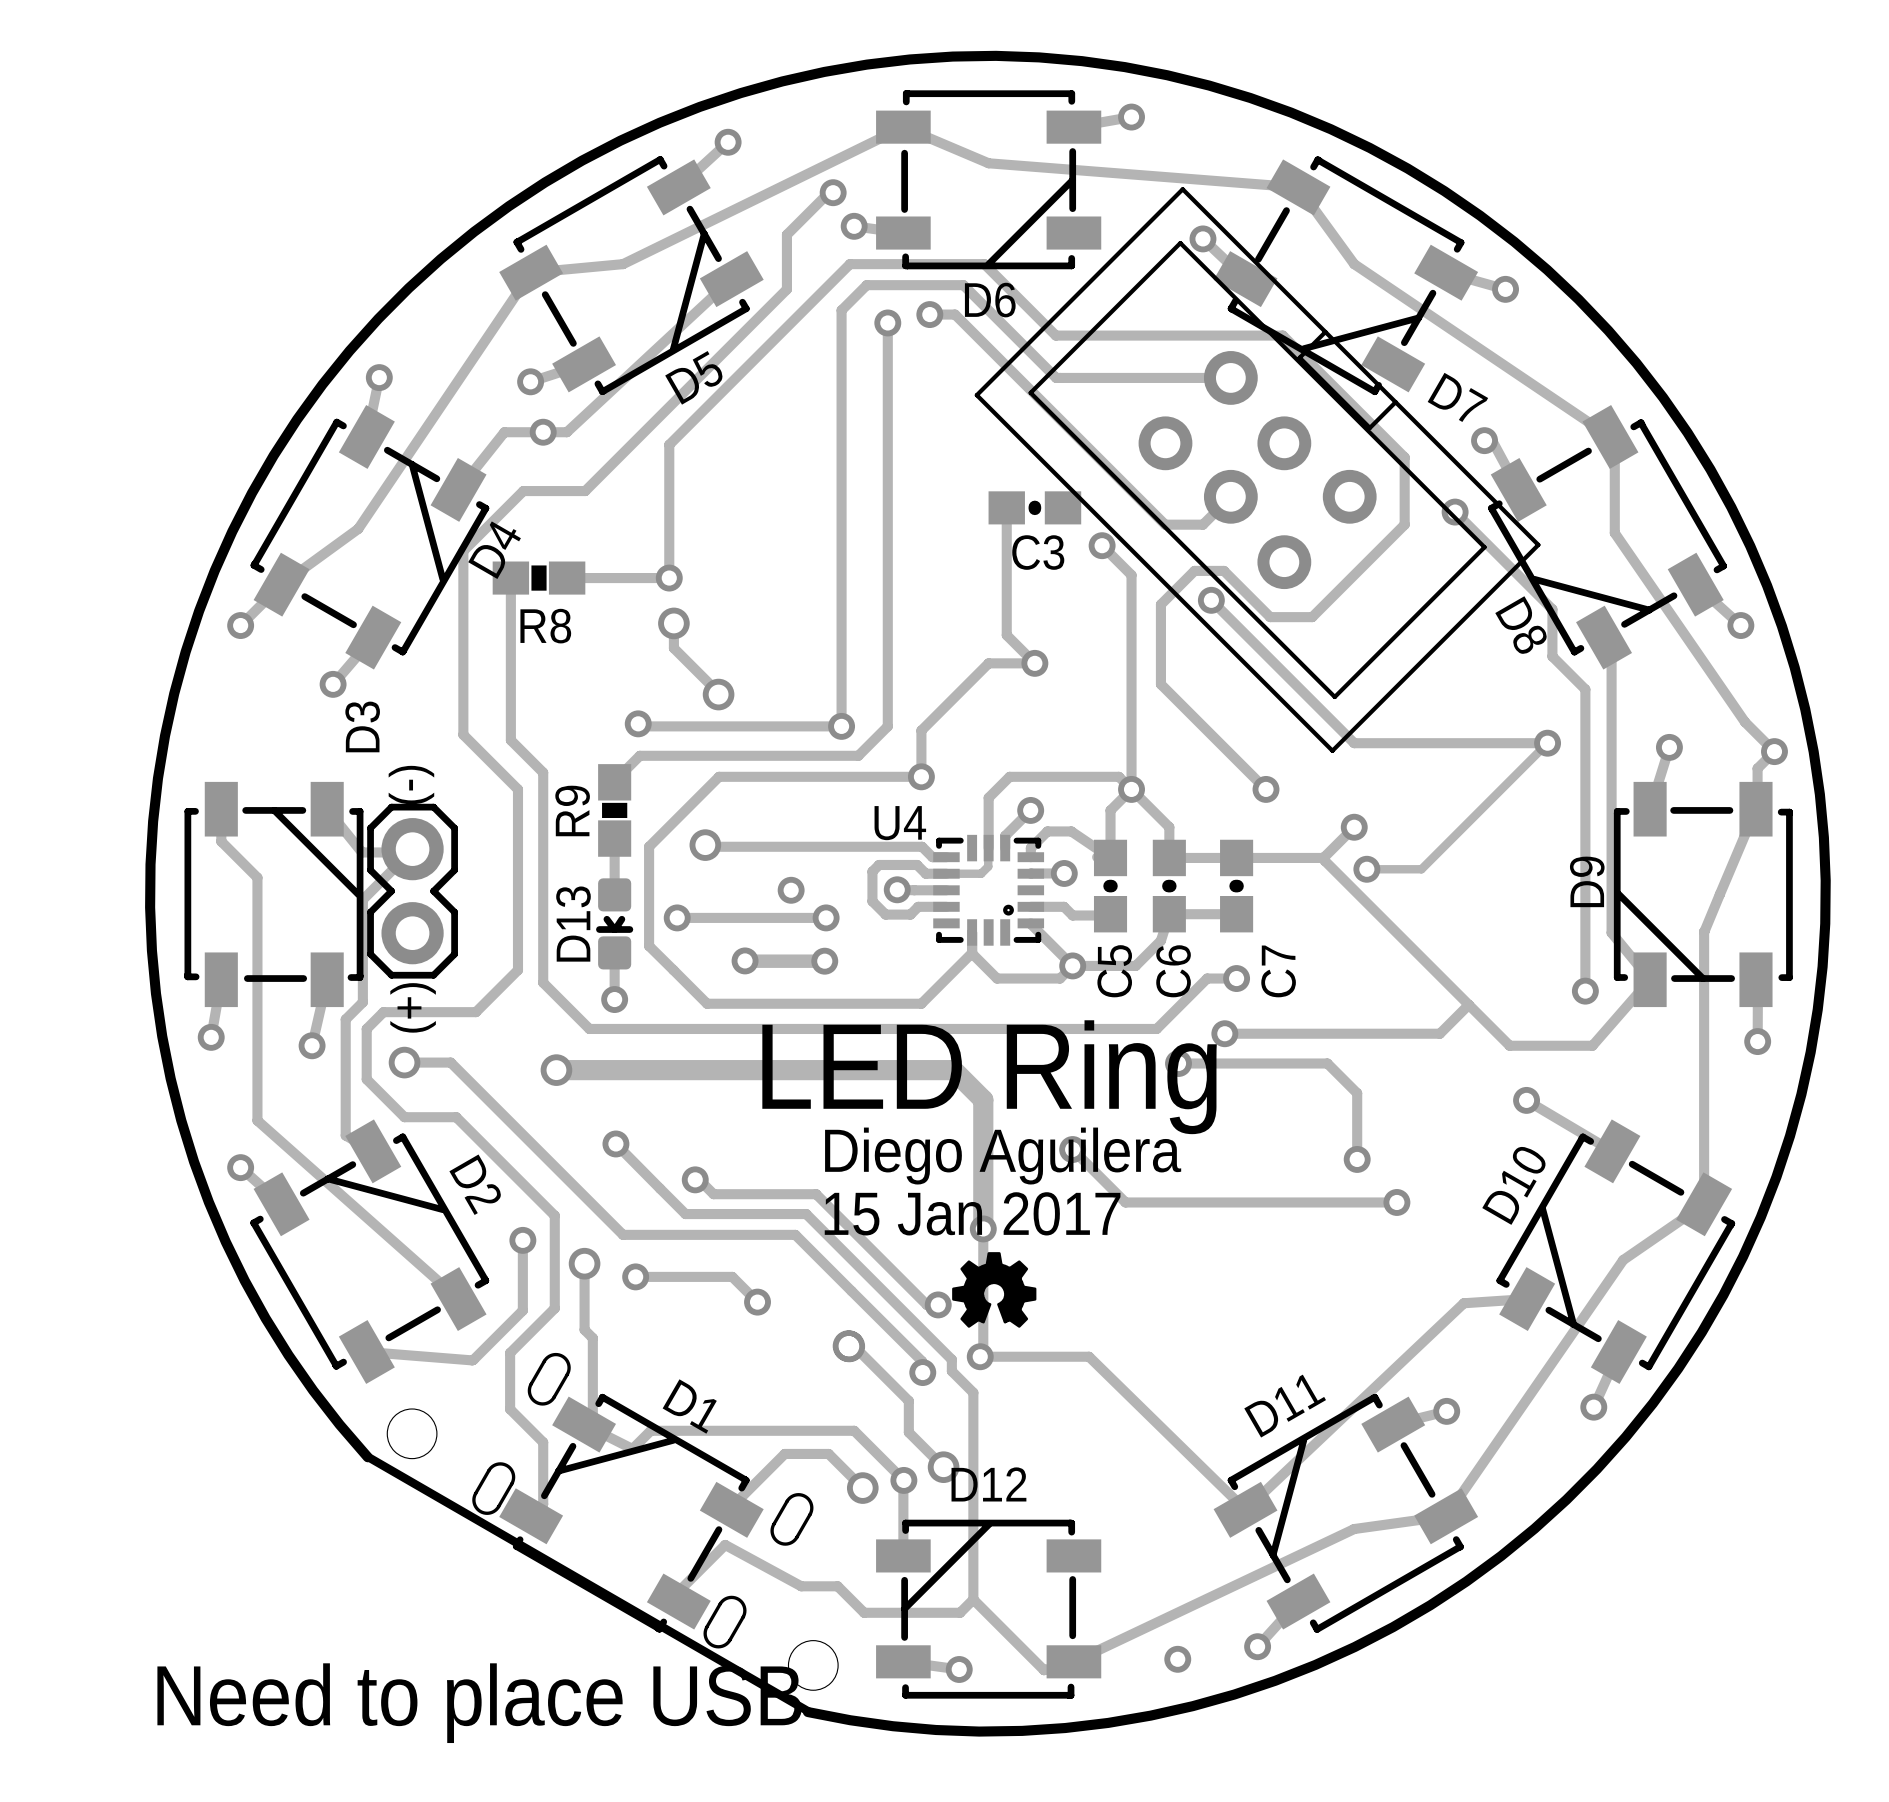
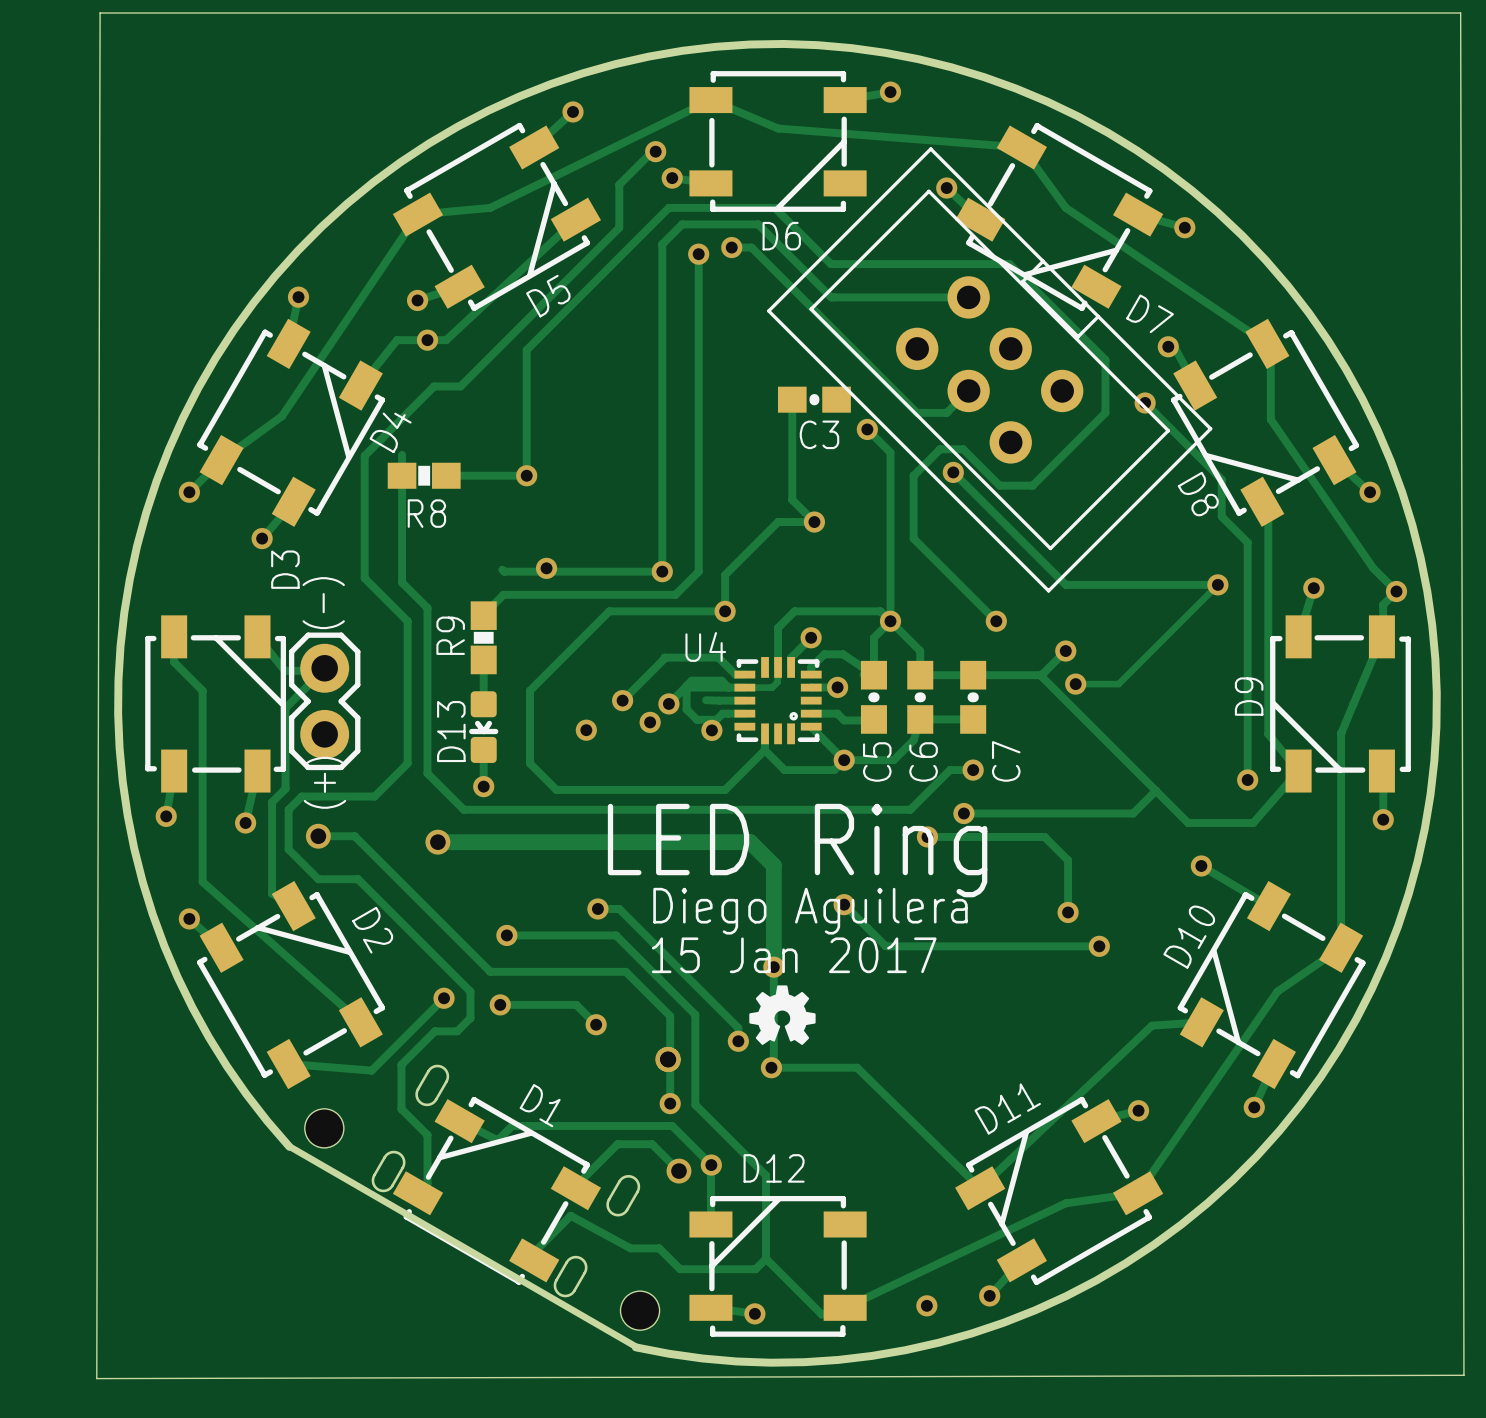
board edge: none -> (100, 13) (1460, 13) (1463, 1375) (96, 1378) (100, 13)
track: (551, 491) (523, 491) (463, 551) (463, 579) -> (434, 386) (364, 455)
R8 position: (539, 578) -> (424, 475)
track: (567, 578) (669, 578) -> (446, 475) (526, 475) (526, 454)
via position: (669, 578) -> (526, 475)
track: (673, 623) (673, 648) (718, 694) -> none
via: (673, 623) -> none
via: (718, 694) -> none
via position: (638, 723) -> (546, 568)
track: (774, 776) (719, 776) (649, 846) (649, 946) (673, 970) -> (609, 611) (530, 690) (530, 763)
track: (705, 845) (707, 846) (922, 846) (934, 857) -> (622, 700) (664, 657) (718, 657) (735, 674)
via: (705, 845) -> none
track: none -> (728, 687) (685, 687) (668, 703)
via: (897, 889) -> none
via: none -> (668, 703)
track: (677, 917) (826, 917) -> none
via: (677, 917) -> none
via: none -> (711, 730)
via position: (745, 960) -> (586, 730)
track: (745, 961) (824, 961) -> none
via: (824, 961) -> none
track: (454, 1117) (554, 1215) (554, 1308) (552, 1310) -> (358, 879) (470, 991) (470, 1018) (457, 1031) (434, 1031)
track: (615, 1143) (685, 1214) (806, 1214) (951, 1359) (951, 1371) (973, 1392) (973, 1493) -> (506, 935) (616, 935) (695, 1014) (695, 1104) (766, 1175)
via: (615, 1143) -> none
via: none -> (597, 908)
track: (695, 1179) (699, 1179) (713, 1194) (816, 1194) (927, 1305) (936, 1305) -> (597, 908) (619, 908) (737, 1027)
via: (695, 1179) -> none
via: none -> (506, 935)
track: (522, 1240) (522, 1310) (472, 1360) -> (444, 998) (371, 1070)
via position: (522, 1240) -> (444, 998)
track: (584, 1263) (584, 1329) (592, 1338) (592, 1415) (584, 1424) -> none
via: (584, 1263) -> none
track: (851, 1291) (922, 1361) (922, 1372) -> (670, 1016) (670, 1103)
via position: (938, 1304) -> (738, 1041)
track: (848, 1346) (853, 1346) (908, 1401) (908, 1432) (943, 1467) -> none
via: (922, 1372) -> none
via: none -> (670, 1103)
via: (943, 1467) -> none
text: Need to place USB (479, 1703) -> none

